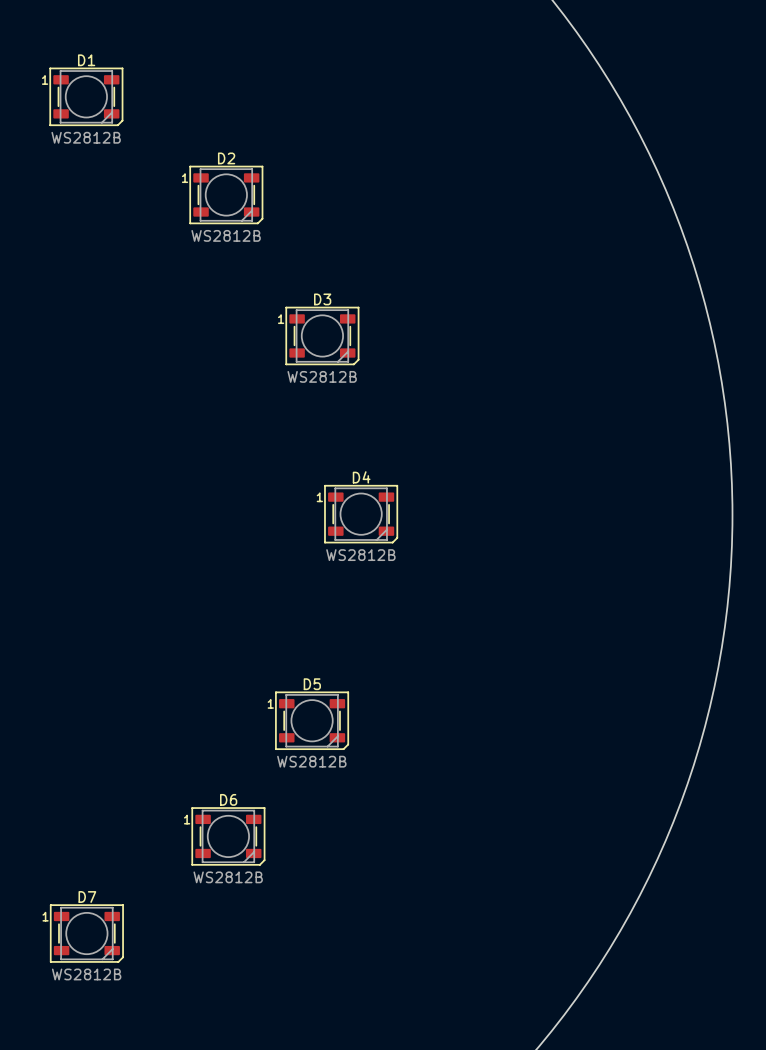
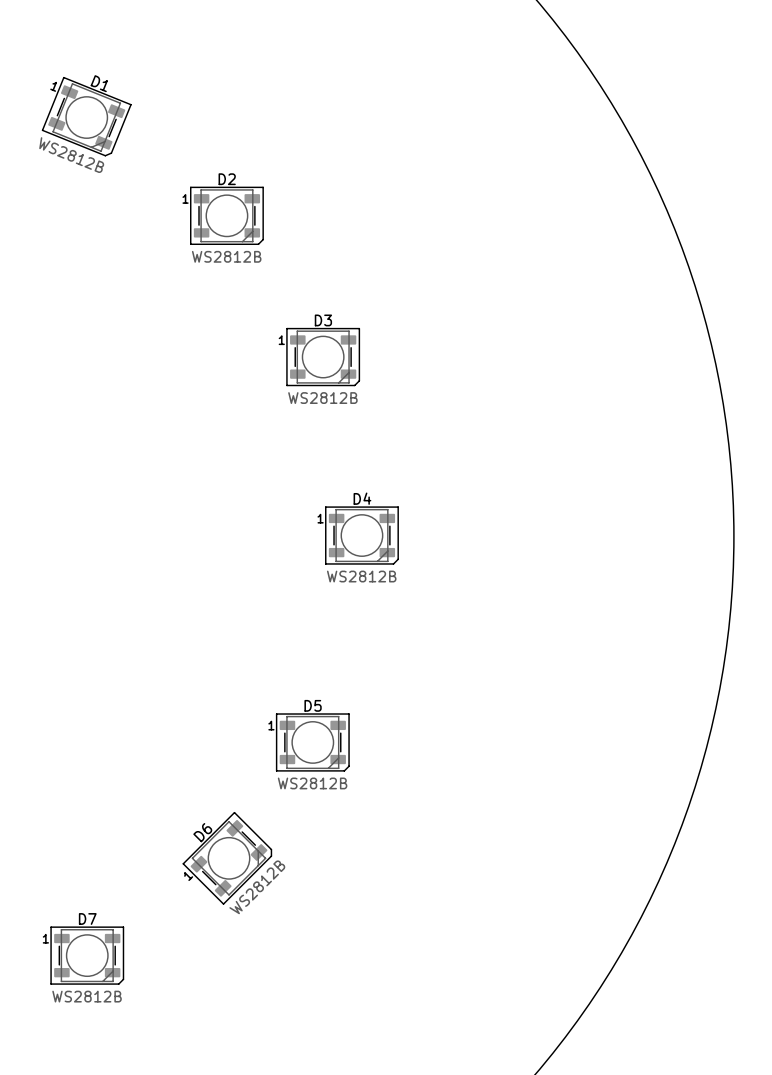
D1 rotation: 0° (86, 96) -> 22° clockwise (86, 116)
D6 rotation: 0° (228, 836) -> 45° counterclockwise (227, 858)

